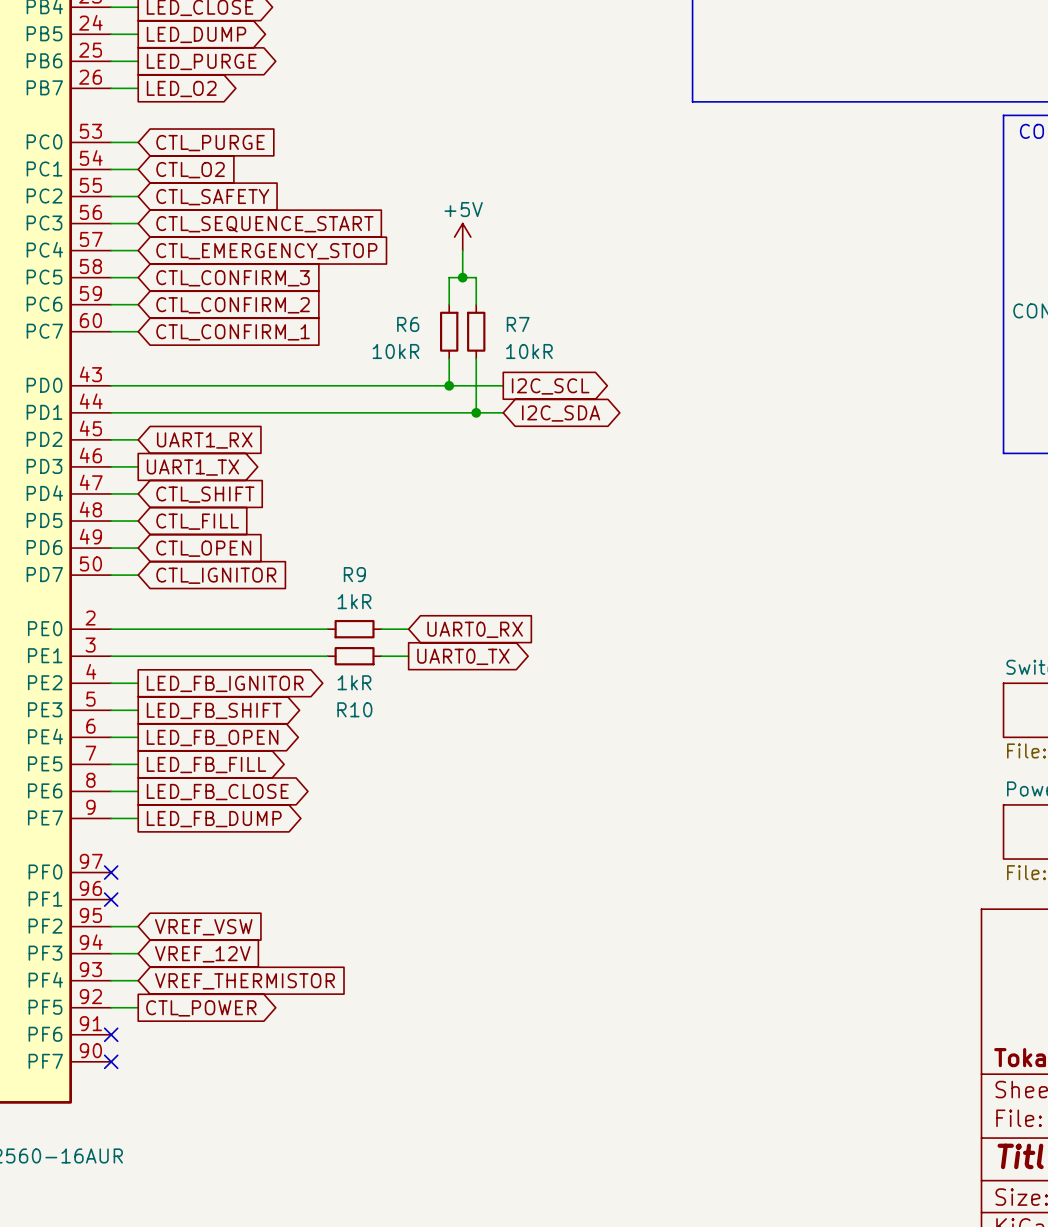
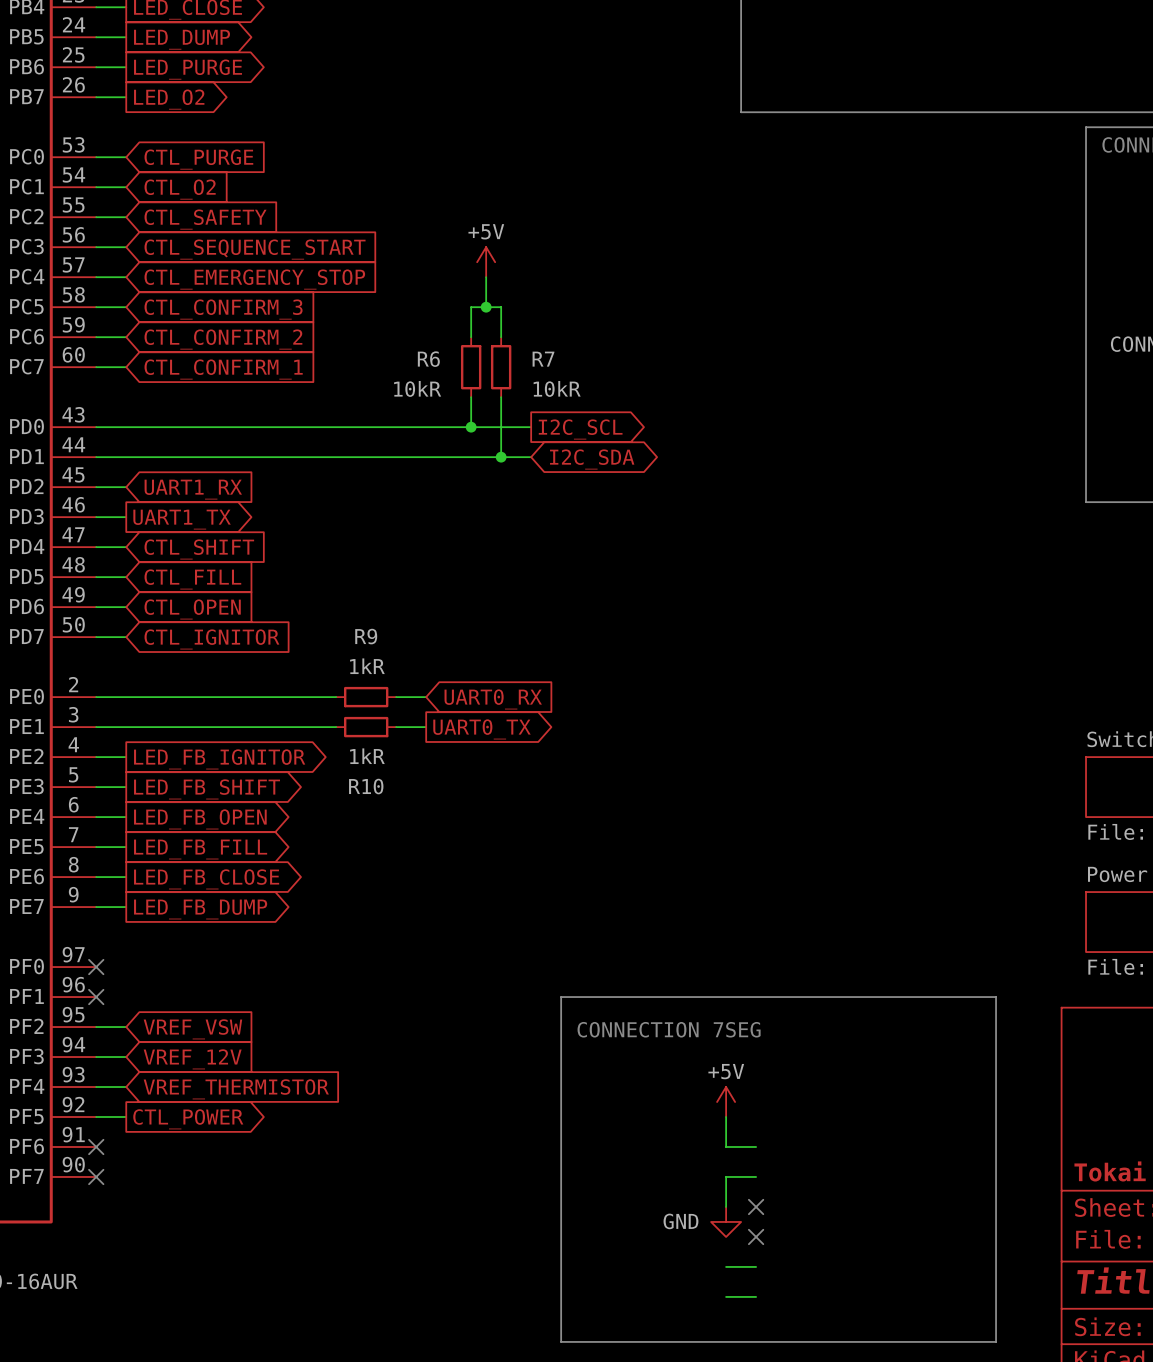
line: none -> (561, 997) (996, 997) (996, 1341) (561, 1341) (561, 997)
text: none -> CONNECTION 7SEG (669, 1029)
power symbol: none -> +5V (726, 1102)
wire: none -> (726, 1117) (726, 1146) (756, 1146)
wire: none -> (756, 1176) (726, 1176) (726, 1206)
no-connect mark: none -> (756, 1206)
power symbol: none -> GND (726, 1221)
no-connect mark: none -> (756, 1236)
wire: none -> (726, 1266) (756, 1266)
wire: none -> (726, 1296) (756, 1296)

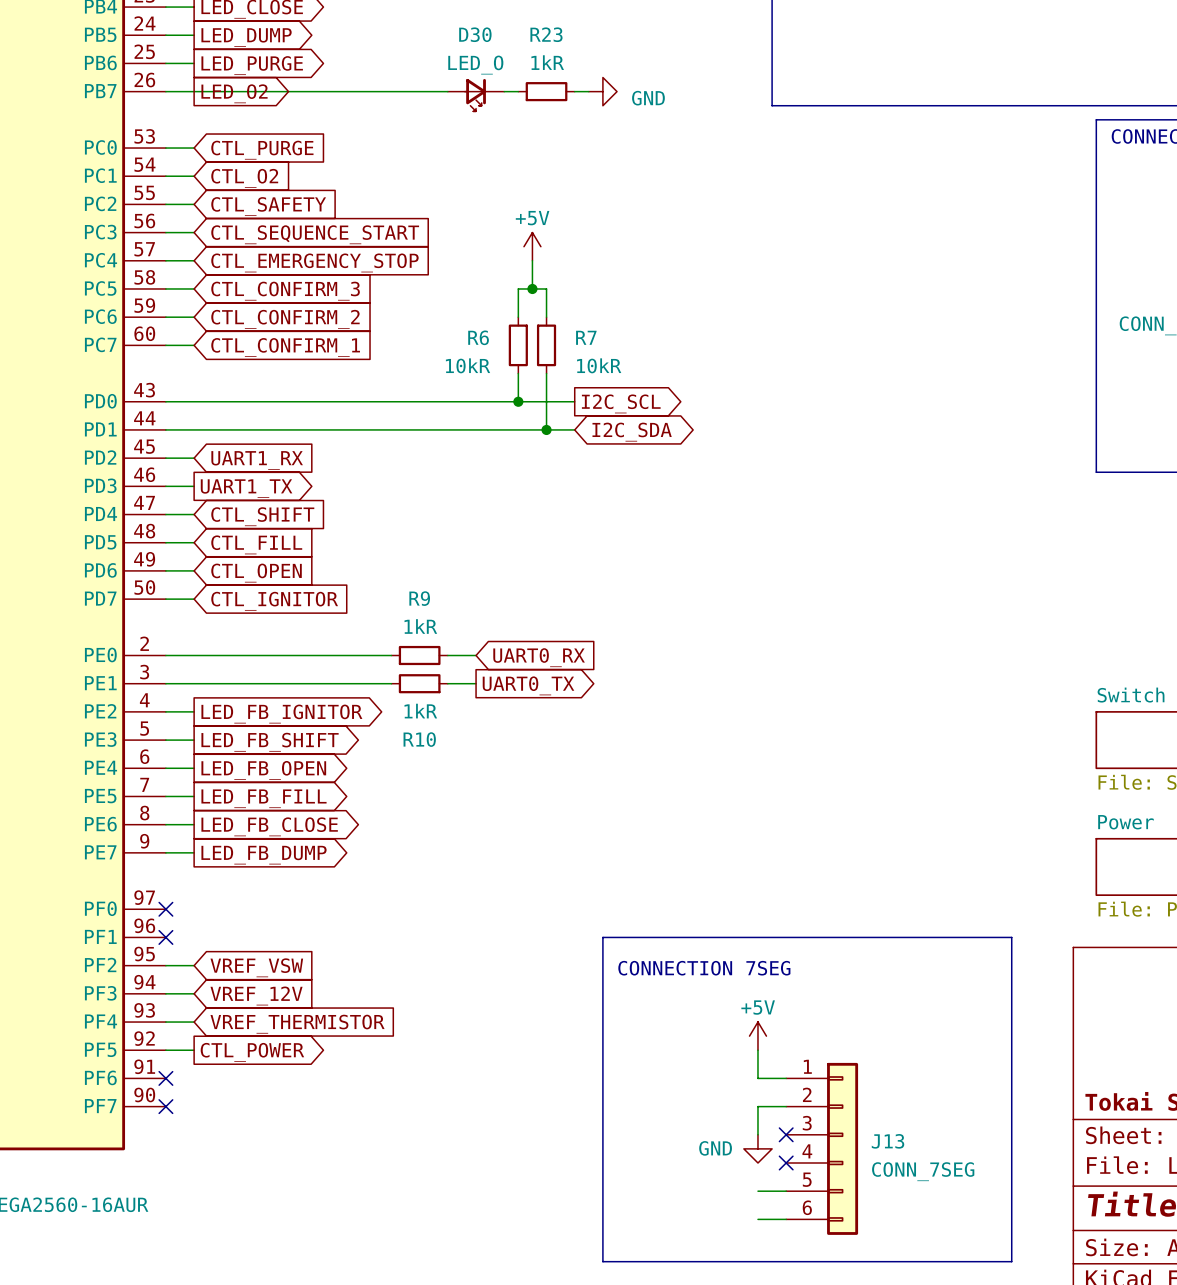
wire: none -> (194, 91) (447, 91)
wire: none -> (504, 91) (518, 91)
R23: none -> 1kR (546, 91)
wire: none -> (574, 91) (588, 91)
power symbol: none -> GND (602, 91)
D30: none -> LED_O (476, 95)
J13: none -> CONN_7SEG (822, 1148)

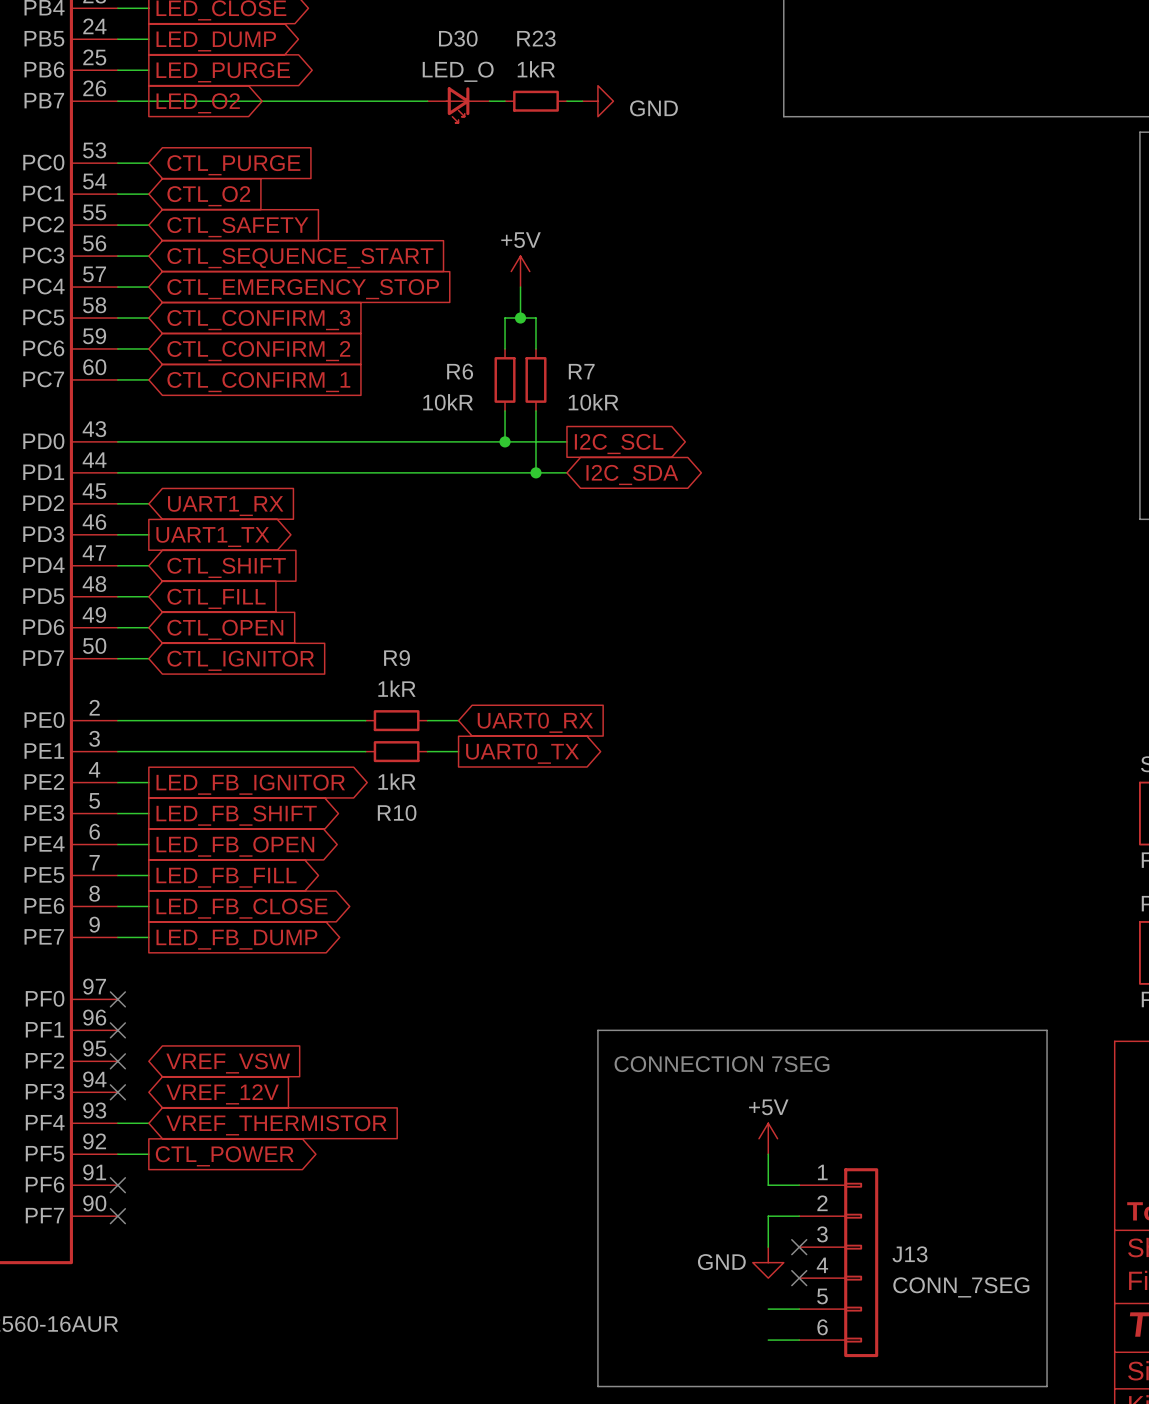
wire: (165, 965) (194, 965) -> none
no-connect mark: none -> (117, 1061)
wire: (165, 993) (194, 993) -> none
no-connect mark: none -> (117, 1092)

